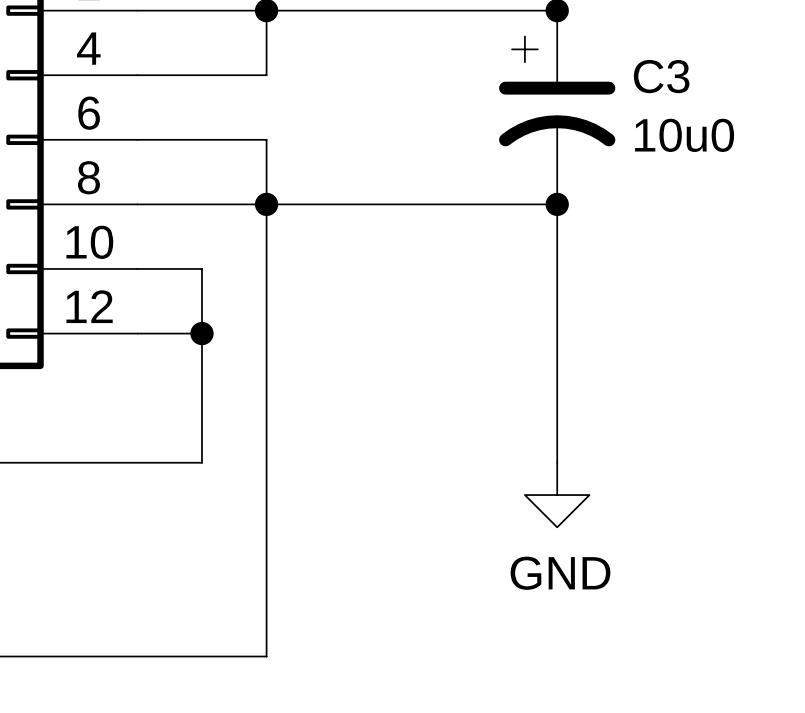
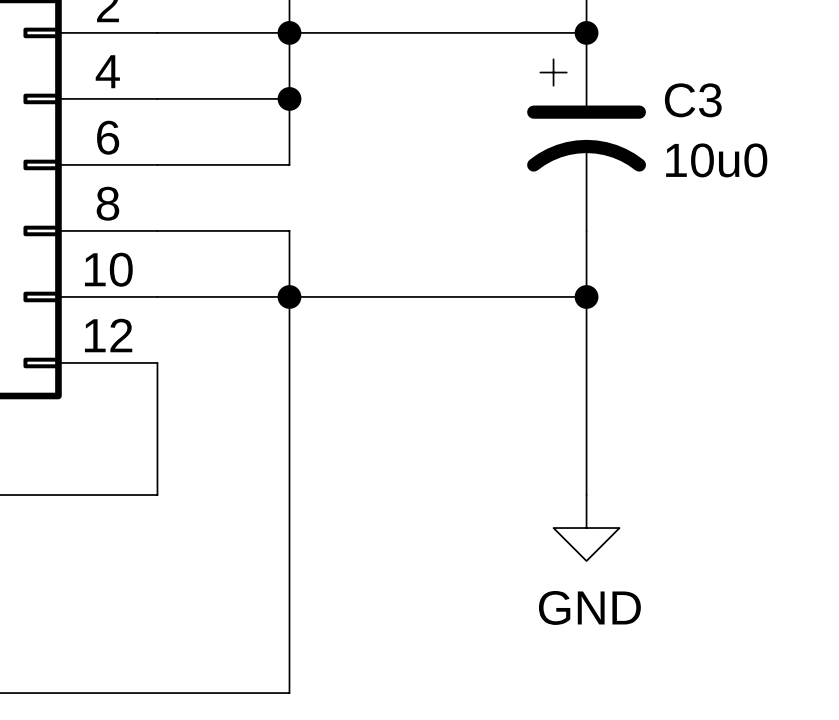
junction: none -> (289, 98)
wire: (266, 139) (266, 204) (557, 204) -> (289, 164) (289, 98)
junction: (266, 204) -> none
junction position: (557, 204) -> (586, 296)
wire: (201, 268) (201, 462) (137, 462) -> (157, 362) (157, 495)
wire: none -> (223, 296) (586, 296)
junction: none -> (289, 296)
wire: (137, 333) (201, 333) -> none
junction: (201, 333) -> none

